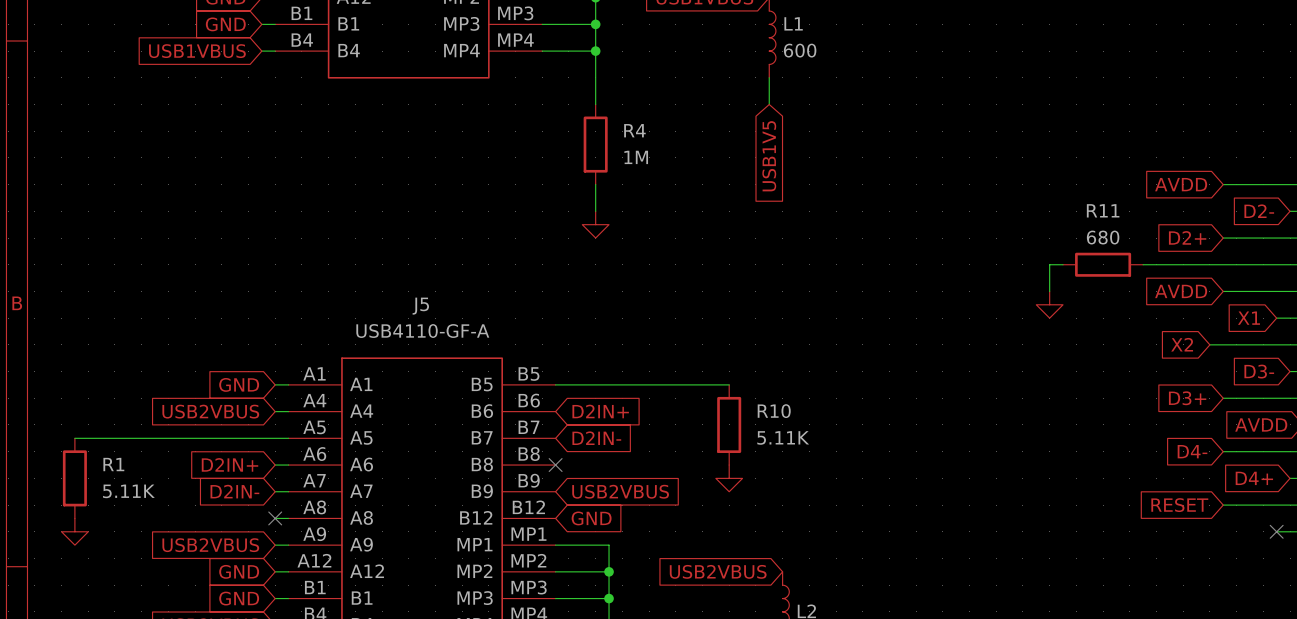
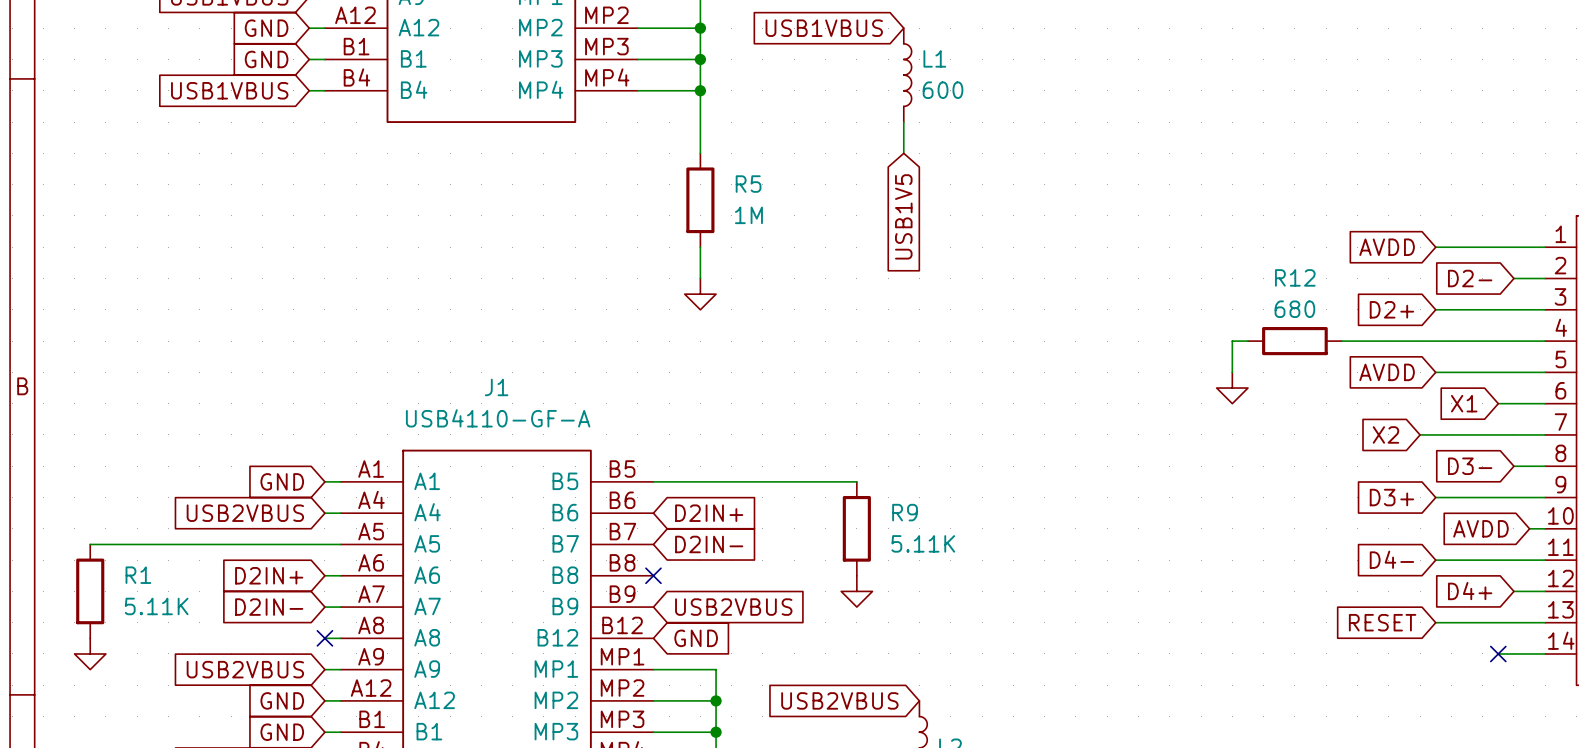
R4 name: R4 (634, 130) -> R5 (748, 184)
R11 name: R11 (1103, 210) -> R12 (1295, 277)
J5 name: J5 (420, 306) -> J1 (496, 387)
R10 name: R10 (774, 411) -> R9 (905, 512)

